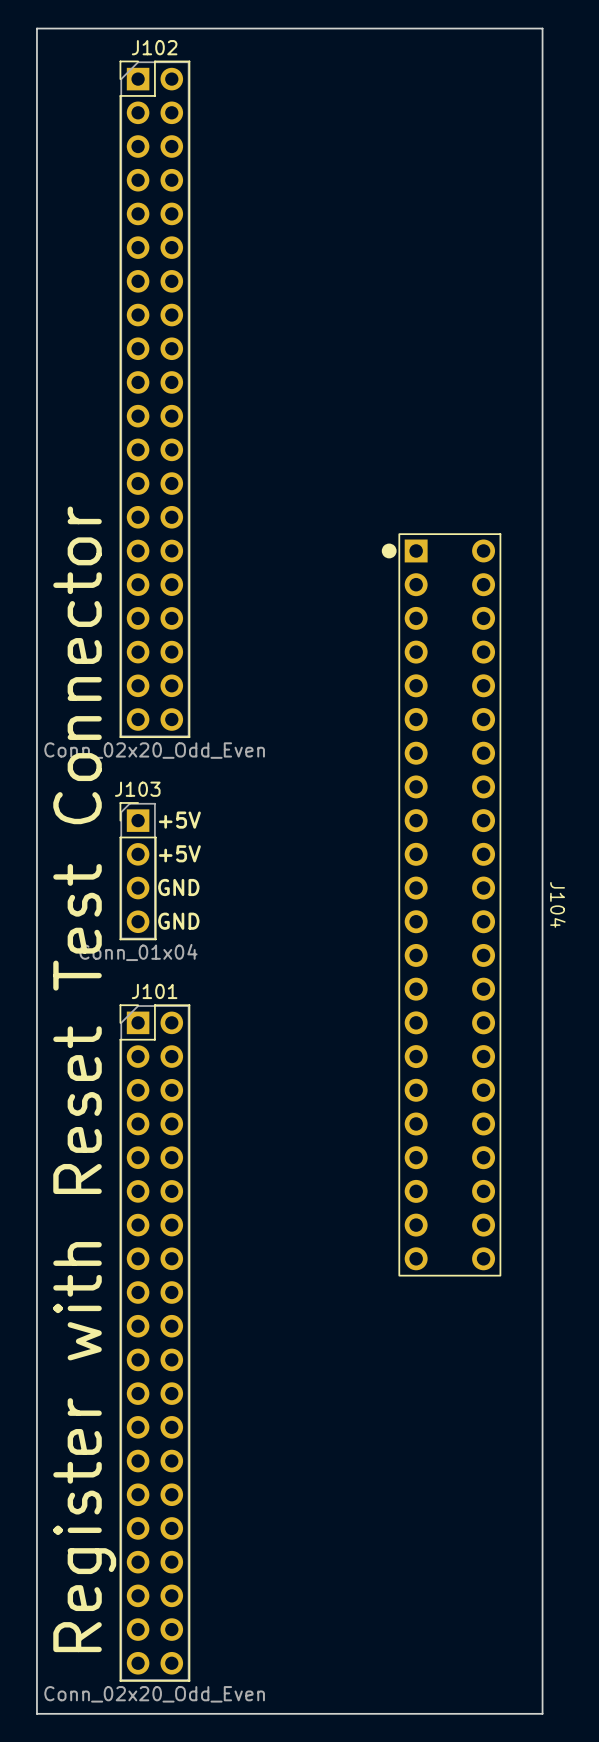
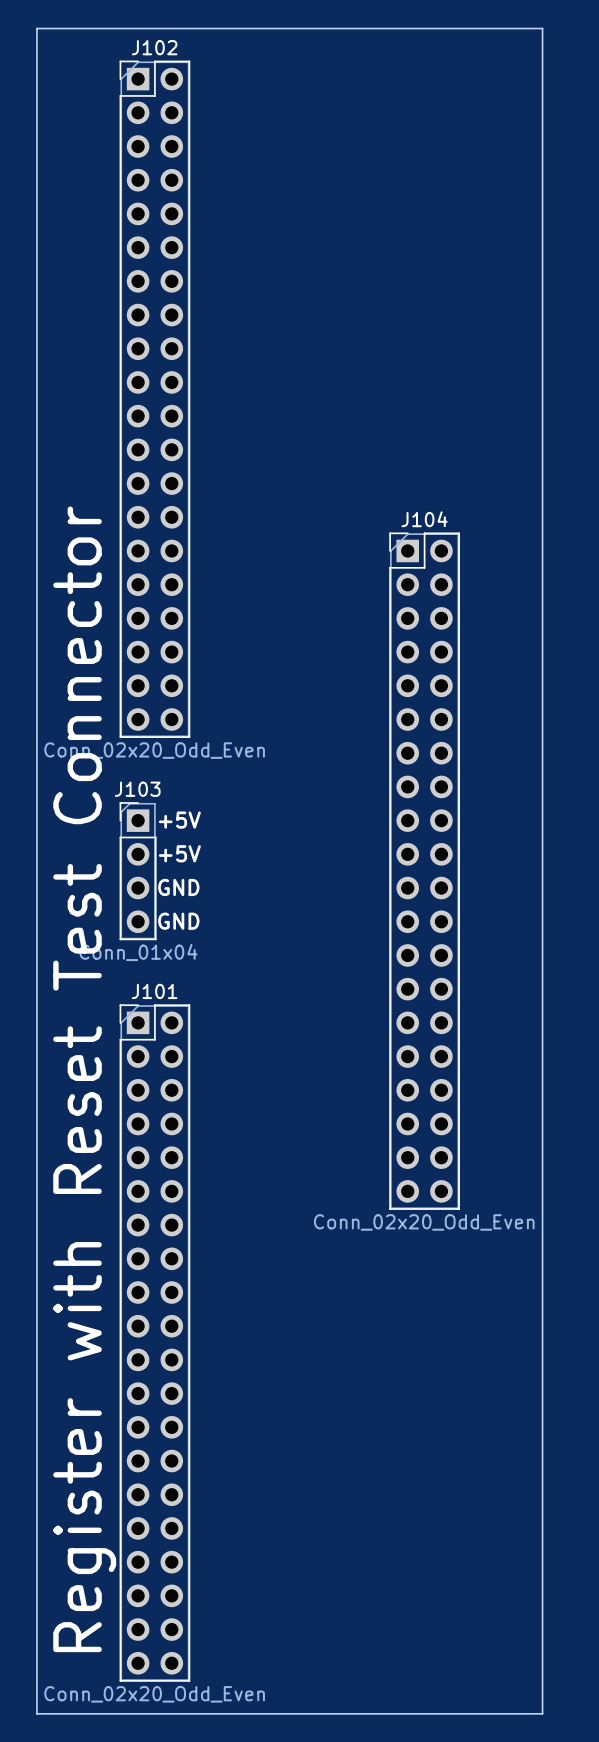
J104 footprint: [381, 533, 502, 1277] -> [389, 532, 460, 1210]
J104 name position: J104 (557, 904) -> J104 (424, 519)
J104 value: none -> Conn_02x20_Odd_Even (424, 1222)

